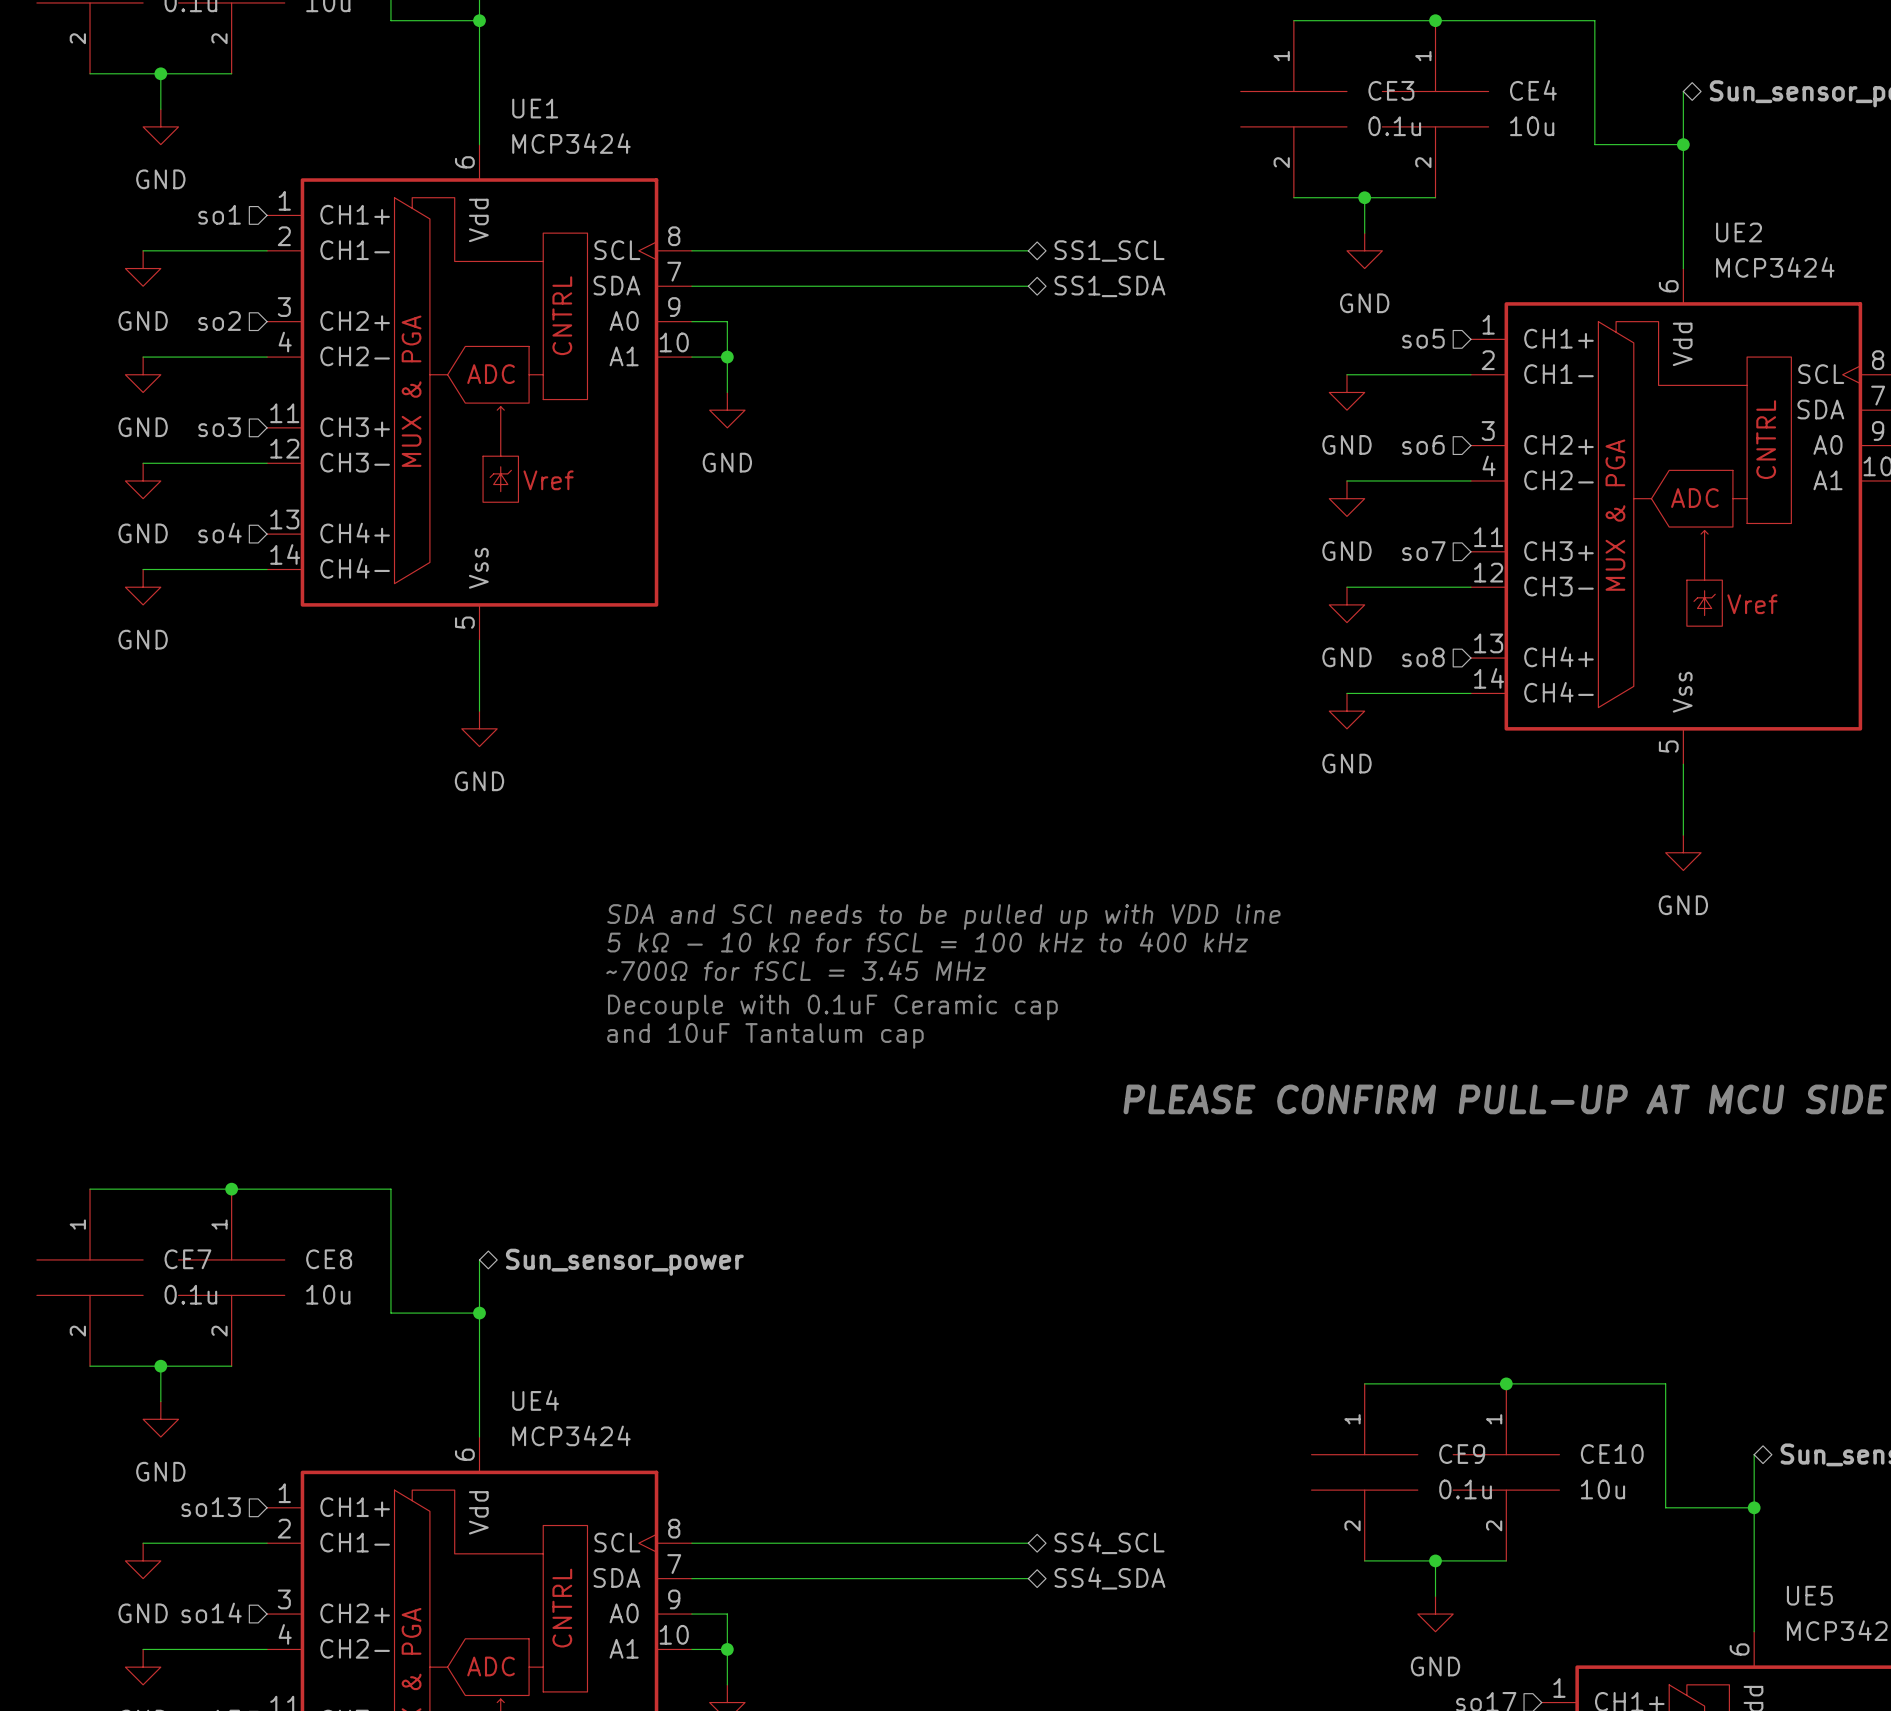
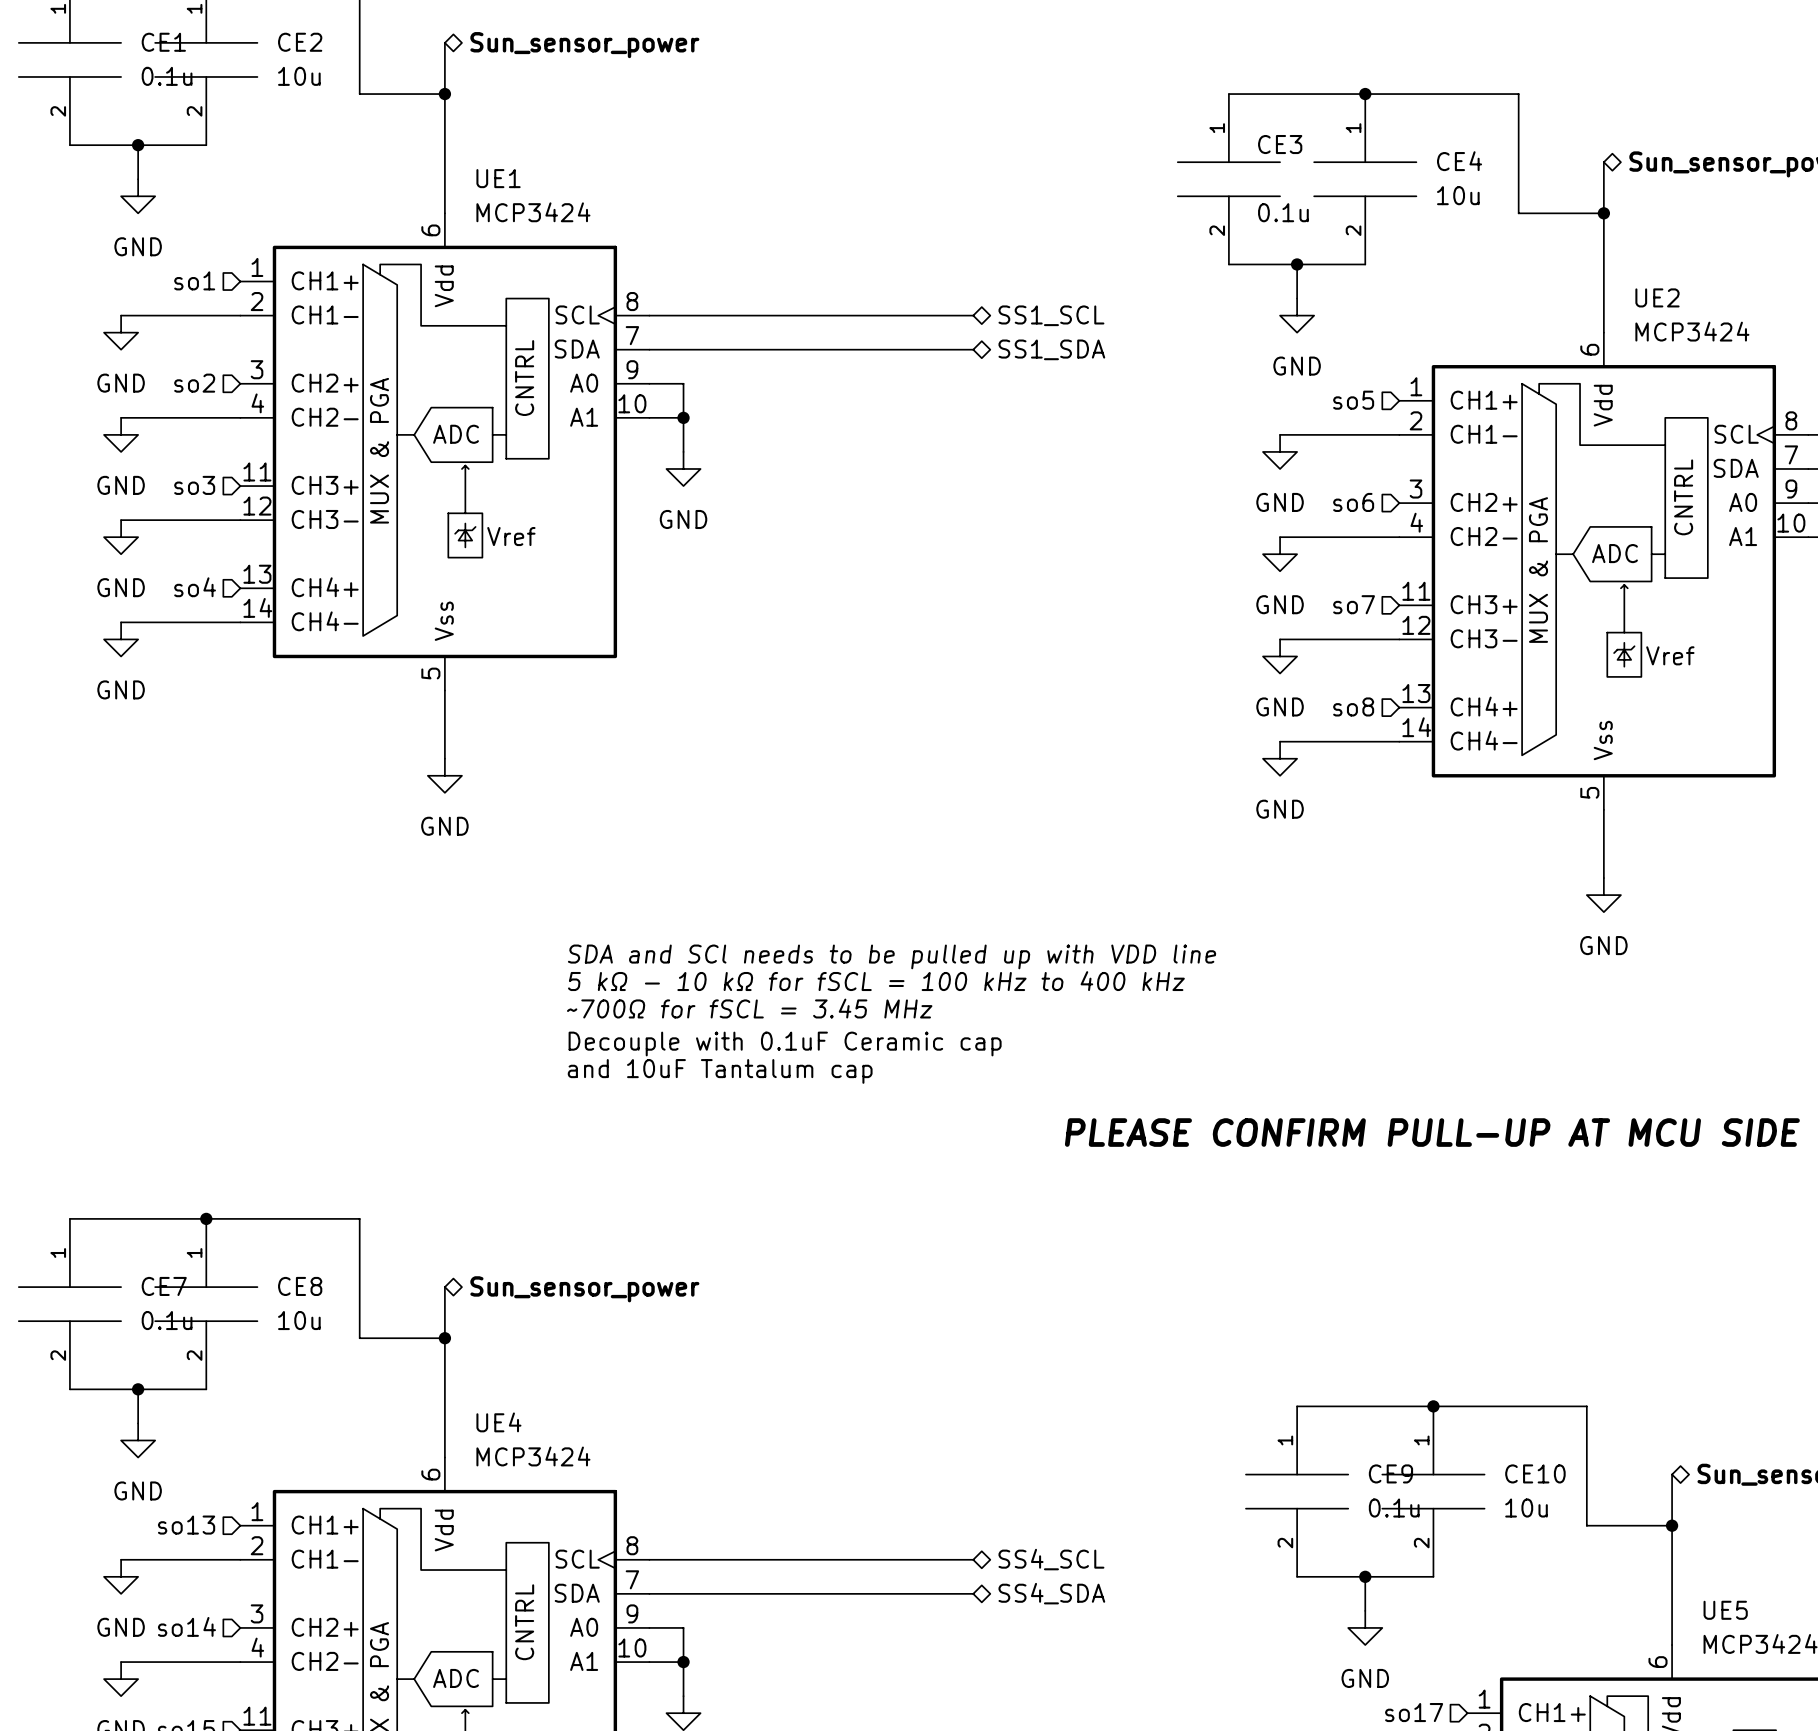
CE3 name position: CE3 (1391, 90) -> CE3 (1280, 144)
CE3 value position: 0.1u (1394, 126) -> 0.1u (1283, 212)

